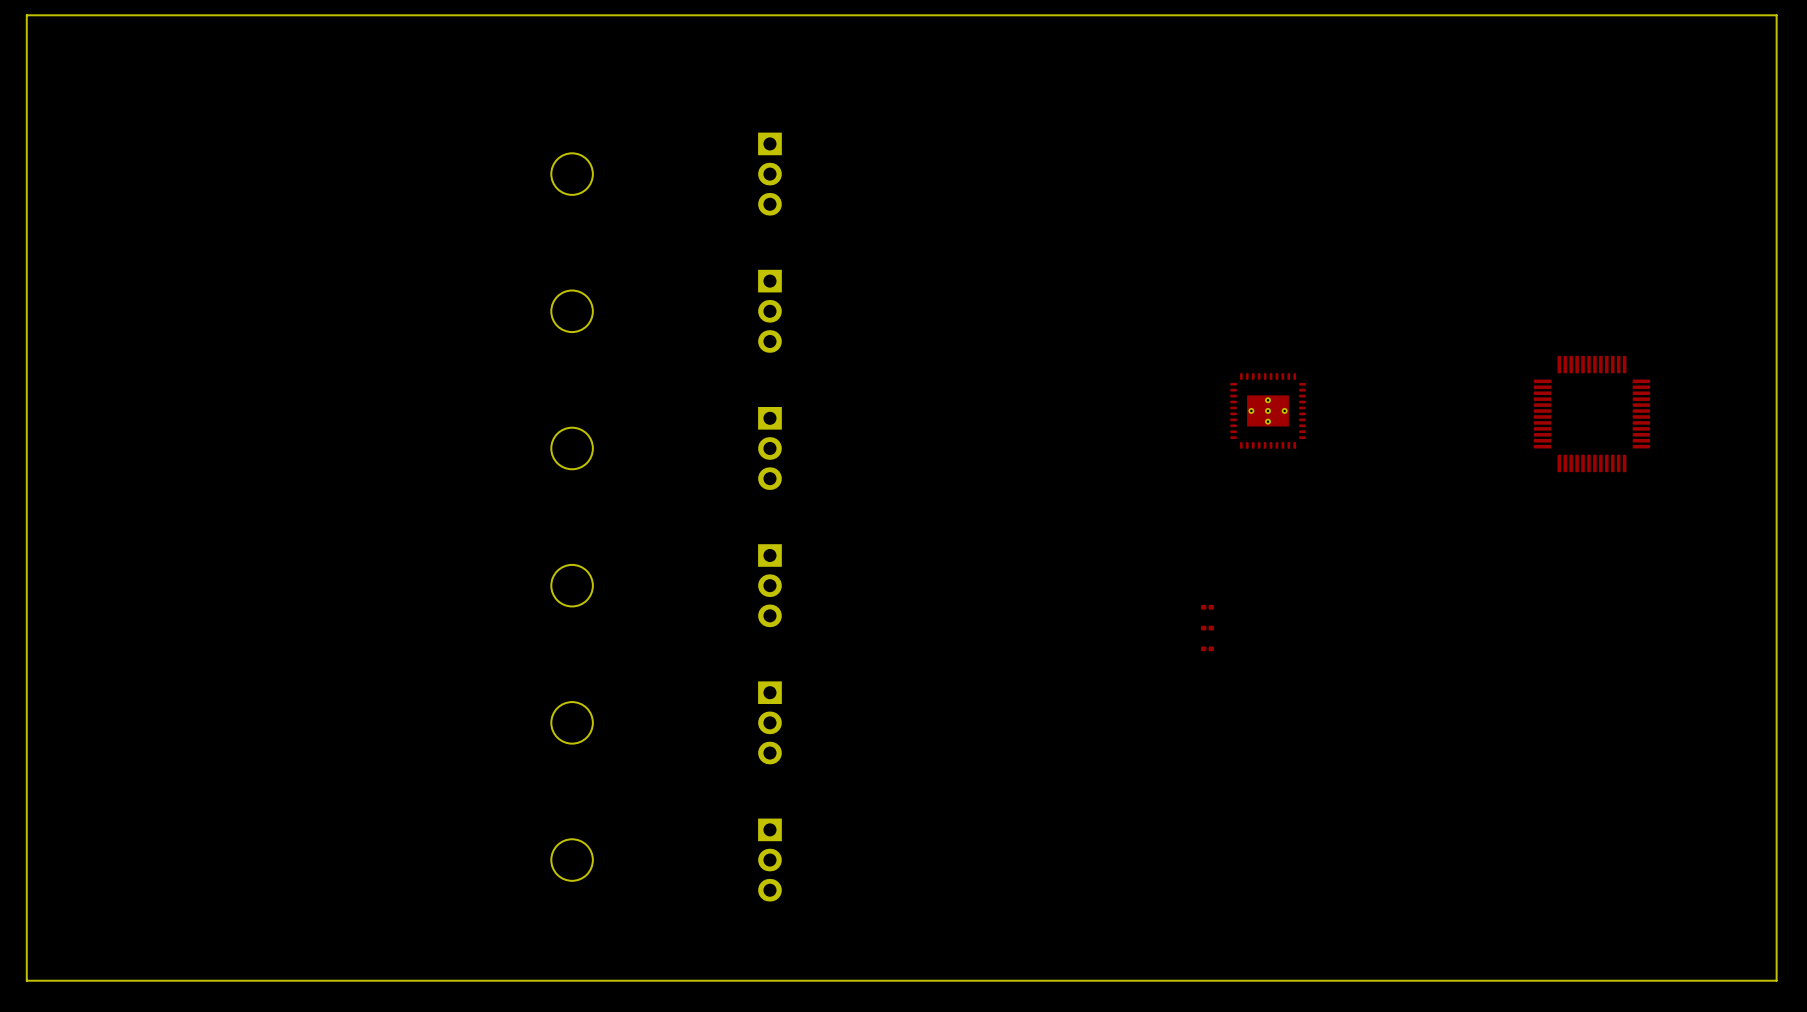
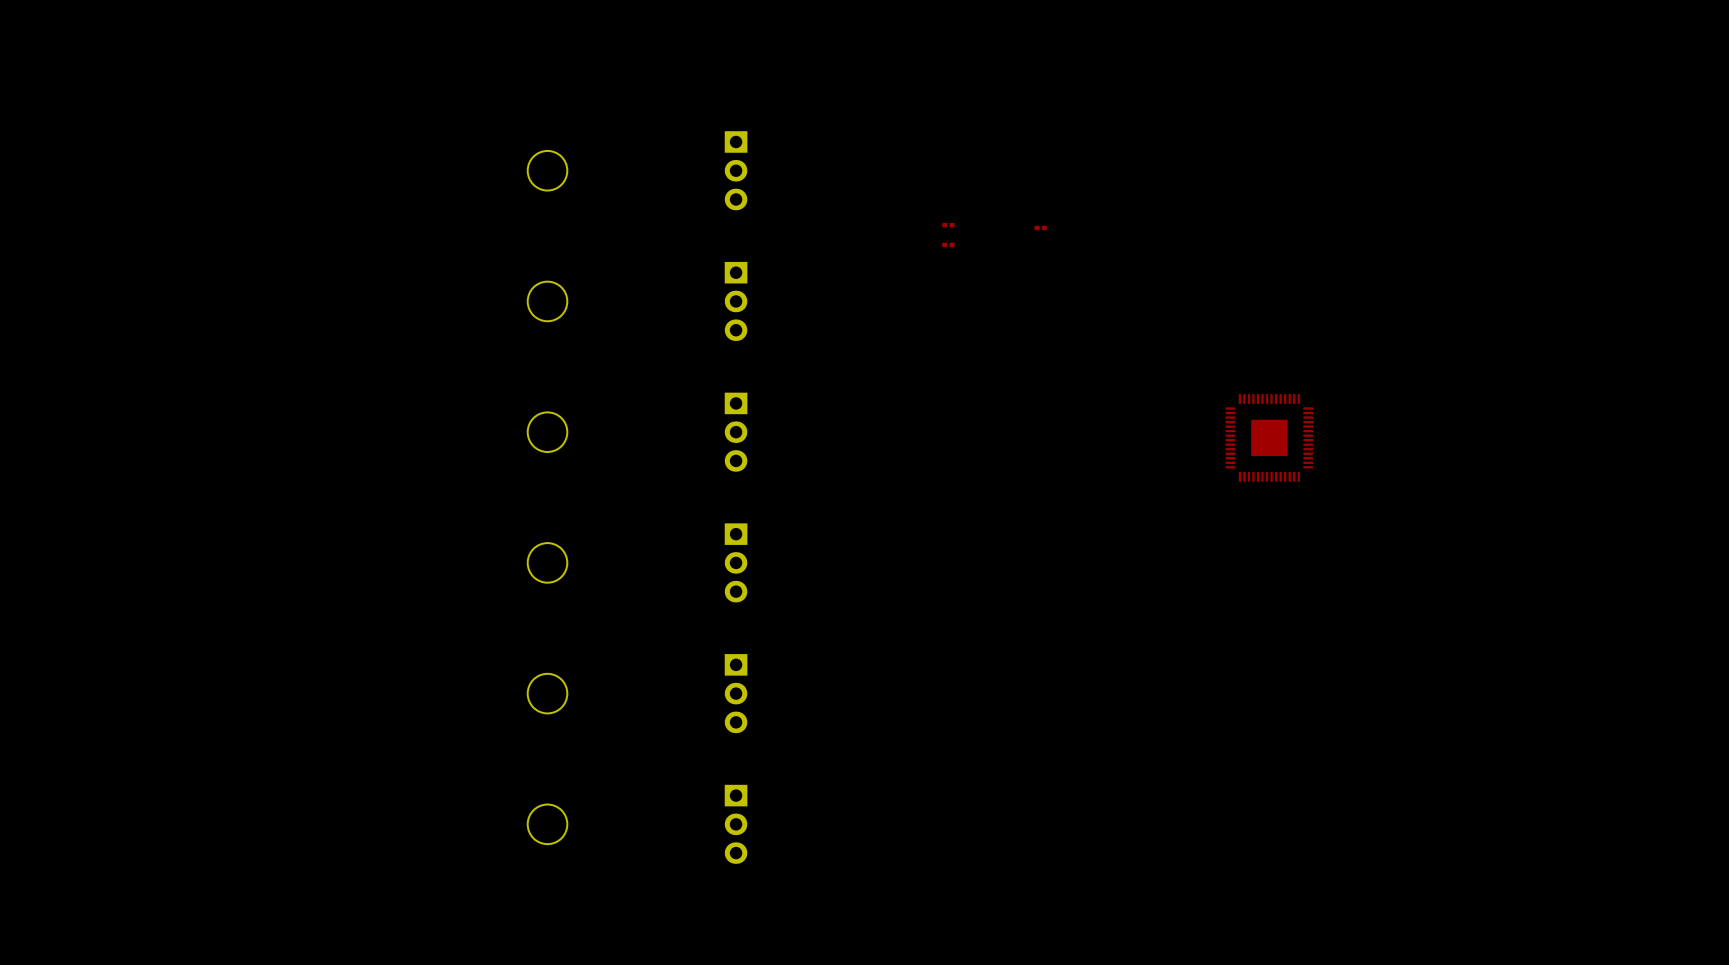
board edge: (1776, 15) (26, 15) (26, 980) (1776, 980) (1776, 15) -> none
part: none -> (948, 225)
part: none -> (1040, 227)
part: none -> (948, 244)
part: (1268, 410) -> none
part: (1591, 414) -> none
part: none -> (1269, 437)
part: (1207, 607) -> none
part: (1207, 628) -> none
part: (1207, 648) -> none

